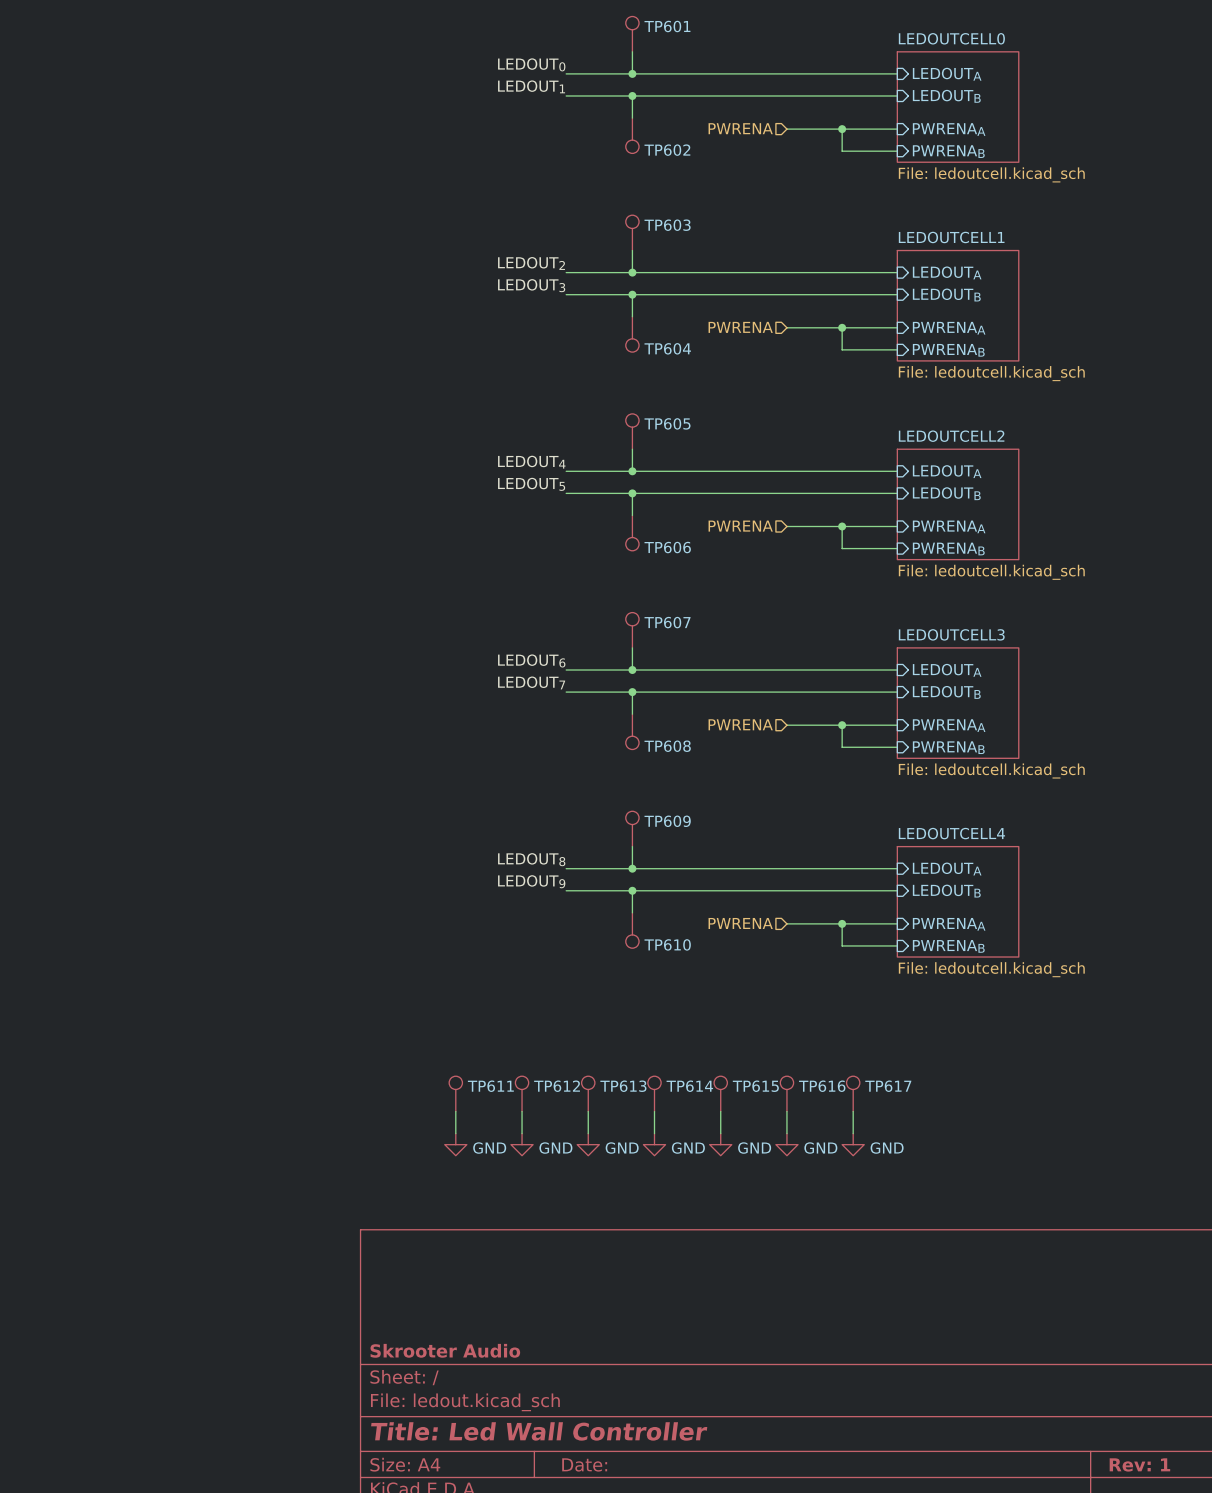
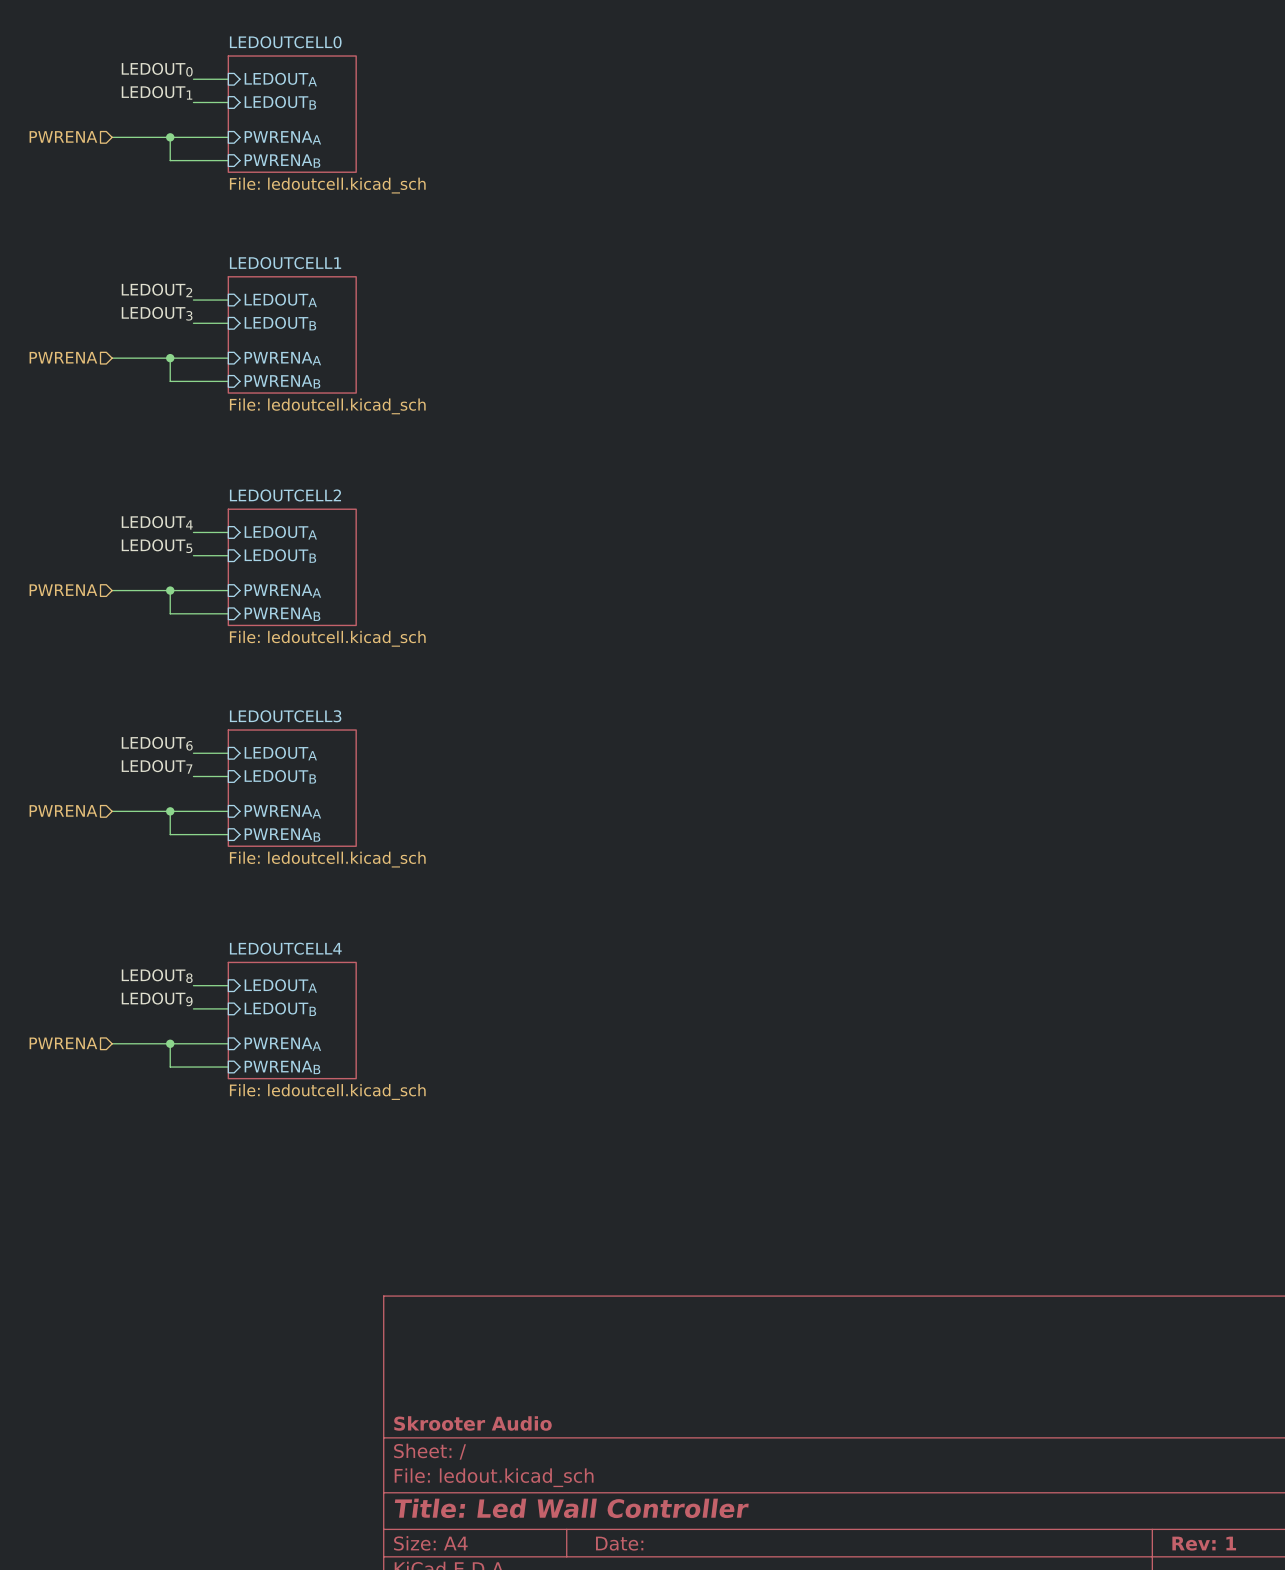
TP601: (632, 34) -> none
wire: (632, 51) (632, 73) -> none
label: none -> LEDOUT0 (157, 69)
label: LEDOUT0 (531, 64) -> none
wire: none -> (193, 79) (228, 79)
wire: (566, 73) (897, 73) -> none
junction: (632, 73) -> none
sheet pin: none -> LEDOUTA (280, 79)
sheet pin: LEDOUTA (947, 74) -> none
label: none -> LEDOUT1 (157, 92)
label: LEDOUT1 (531, 86) -> none
wire: none -> (193, 102) (228, 102)
wire: (566, 95) (897, 95) -> none
wire: (632, 95) (632, 118) -> none
junction: (632, 95) -> none
sheet pin: none -> LEDOUTB (280, 102)
sheet pin: LEDOUTB (946, 96) -> none
sheet LEDOUTCELL0 position: (958, 107) -> (292, 114)
hierarchical label: none -> PWRENA (63, 136)
hierarchical label: PWRENA (740, 128) -> none
wire: none -> (112, 137) (228, 137)
wire: none -> (170, 137) (170, 160) (228, 160)
junction: none -> (170, 137)
sheet pin: none -> PWRENAA (282, 137)
wire: (786, 129) (897, 129) -> none
wire: (842, 129) (842, 151) (897, 151) -> none
junction: (842, 129) -> none
sheet pin: PWRENAA (949, 129) -> none
TP602: (632, 135) -> none
sheet pin: none -> PWRENAB (282, 161)
sheet pin: PWRENAB (948, 151) -> none
TP603: (632, 232) -> none
wire: (632, 250) (632, 272) -> none
label: LEDOUT2 (531, 263) -> none
wire: (566, 272) (897, 272) -> none
junction: (632, 272) -> none
sheet pin: LEDOUTA (947, 272) -> none
label: none -> LEDOUT2 (156, 290)
wire: none -> (193, 300) (228, 300)
sheet pin: none -> LEDOUTA (280, 300)
label: LEDOUT3 (531, 285) -> none
wire: (566, 294) (897, 294) -> none
wire: (632, 294) (632, 316) -> none
junction: (632, 294) -> none
sheet pin: LEDOUTB (946, 295) -> none
label: none -> LEDOUT3 (157, 313)
wire: none -> (193, 323) (228, 323)
sheet LEDOUTCELL1 position: (958, 305) -> (292, 334)
sheet pin: none -> LEDOUTB (280, 323)
hierarchical label: PWRENA (740, 327) -> none
wire: (786, 327) (897, 327) -> none
wire: (842, 327) (842, 349) (897, 349) -> none
junction: (842, 327) -> none
sheet pin: PWRENAA (949, 328) -> none
TP604: (632, 334) -> none
hierarchical label: none -> PWRENA (63, 357)
wire: none -> (112, 358) (228, 358)
wire: none -> (170, 358) (170, 381) (228, 381)
junction: none -> (170, 358)
sheet pin: none -> PWRENAA (282, 358)
sheet pin: PWRENAB (948, 350) -> none
sheet pin: none -> PWRENAB (282, 381)
TP605: (632, 431) -> none
wire: (632, 449) (632, 471) -> none
label: LEDOUT4 (531, 462) -> none
wire: (566, 471) (897, 471) -> none
junction: (632, 471) -> none
sheet pin: LEDOUTA (947, 471) -> none
label: LEDOUT5 (531, 484) -> none
wire: (566, 493) (897, 493) -> none
wire: (632, 493) (632, 515) -> none
junction: (632, 493) -> none
sheet pin: LEDOUTB (946, 493) -> none
label: none -> LEDOUT4 (157, 522)
wire: none -> (193, 532) (228, 532)
sheet pin: none -> LEDOUTA (280, 532)
sheet LEDOUTCELL2 position: (958, 504) -> (292, 567)
label: none -> LEDOUT5 (157, 546)
wire: none -> (193, 555) (228, 555)
sheet pin: none -> LEDOUTB (280, 556)
hierarchical label: PWRENA (740, 526) -> none
wire: (786, 526) (897, 526) -> none
wire: (842, 526) (842, 548) (897, 548) -> none
junction: (842, 526) -> none
sheet pin: PWRENAA (949, 526) -> none
TP606: (632, 533) -> none
sheet pin: PWRENAB (948, 548) -> none
hierarchical label: none -> PWRENA (63, 590)
wire: none -> (112, 590) (228, 590)
wire: none -> (170, 590) (170, 613) (228, 613)
junction: none -> (170, 590)
sheet pin: none -> PWRENAA (282, 591)
sheet pin: none -> PWRENAB (282, 614)
TP607: (632, 630) -> none
wire: (632, 647) (632, 670) -> none
label: LEDOUT6 (531, 660) -> none
wire: (566, 670) (897, 670) -> none
junction: (632, 670) -> none
sheet pin: LEDOUTA (947, 670) -> none
label: LEDOUT7 (531, 682) -> none
wire: (566, 692) (897, 692) -> none
wire: (632, 692) (632, 714) -> none
junction: (632, 692) -> none
sheet pin: LEDOUTB (946, 692) -> none
sheet LEDOUTCELL3 position: (958, 703) -> (292, 788)
label: none -> LEDOUT6 (157, 743)
wire: none -> (193, 753) (228, 753)
sheet pin: none -> LEDOUTA (280, 753)
hierarchical label: PWRENA (740, 724) -> none
wire: (786, 725) (897, 725) -> none
wire: (842, 725) (842, 747) (897, 747) -> none
junction: (842, 725) -> none
sheet pin: PWRENAA (949, 725) -> none
label: none -> LEDOUT7 (157, 766)
TP608: (632, 731) -> none
wire: none -> (193, 776) (228, 776)
sheet pin: none -> LEDOUTB (280, 776)
sheet pin: PWRENAB (948, 747) -> none
hierarchical label: none -> PWRENA (63, 810)
wire: none -> (112, 811) (228, 811)
wire: none -> (170, 811) (170, 834) (228, 834)
junction: none -> (170, 811)
sheet pin: none -> PWRENAA (282, 811)
sheet pin: none -> PWRENAB (282, 835)
TP609: (632, 828) -> none
wire: (632, 846) (632, 868) -> none
label: LEDOUT8 (531, 859) -> none
wire: (566, 868) (897, 868) -> none
junction: (632, 868) -> none
sheet pin: LEDOUTA (947, 869) -> none
label: LEDOUT9 (531, 881) -> none
wire: (566, 890) (897, 890) -> none
wire: (632, 890) (632, 912) -> none
junction: (632, 890) -> none
sheet pin: LEDOUTB (946, 891) -> none
sheet LEDOUTCELL4 position: (958, 901) -> (292, 1020)
hierarchical label: PWRENA (740, 923) -> none
wire: (786, 923) (897, 923) -> none
wire: (842, 923) (842, 945) (897, 945) -> none
junction: (842, 923) -> none
sheet pin: PWRENAA (949, 924) -> none
label: none -> LEDOUT8 (157, 976)
TP610: (632, 930) -> none
wire: none -> (193, 985) (228, 985)
sheet pin: none -> LEDOUTA (280, 986)
sheet pin: PWRENAB (948, 946) -> none
label: none -> LEDOUT9 (157, 999)
wire: none -> (193, 1008) (228, 1008)
sheet pin: none -> LEDOUTB (280, 1009)
hierarchical label: none -> PWRENA (63, 1043)
wire: none -> (112, 1043) (228, 1043)
wire: none -> (170, 1043) (170, 1067) (228, 1067)
junction: none -> (170, 1043)
sheet pin: none -> PWRENAA (282, 1044)
sheet pin: none -> PWRENAB (282, 1067)
TP611: (455, 1093) -> none
TP612: (522, 1093) -> none
TP613: (588, 1093) -> none
TP614: (654, 1093) -> none
TP615: (720, 1093) -> none
TP616: (786, 1093) -> none
TP617: (853, 1093) -> none
wire: (455, 1111) (455, 1133) -> none
wire: (522, 1111) (522, 1133) -> none
wire: (588, 1111) (588, 1133) -> none
wire: (654, 1111) (654, 1133) -> none
wire: (720, 1111) (720, 1133) -> none
wire: (786, 1111) (786, 1133) -> none
wire: (853, 1111) (853, 1133) -> none
power symbol: GND (455, 1144) -> none
power symbol: GND (522, 1144) -> none
power symbol: GND (588, 1144) -> none
power symbol: GND (654, 1144) -> none
power symbol: GND (720, 1144) -> none
power symbol: GND (786, 1144) -> none
power symbol: GND (853, 1144) -> none

